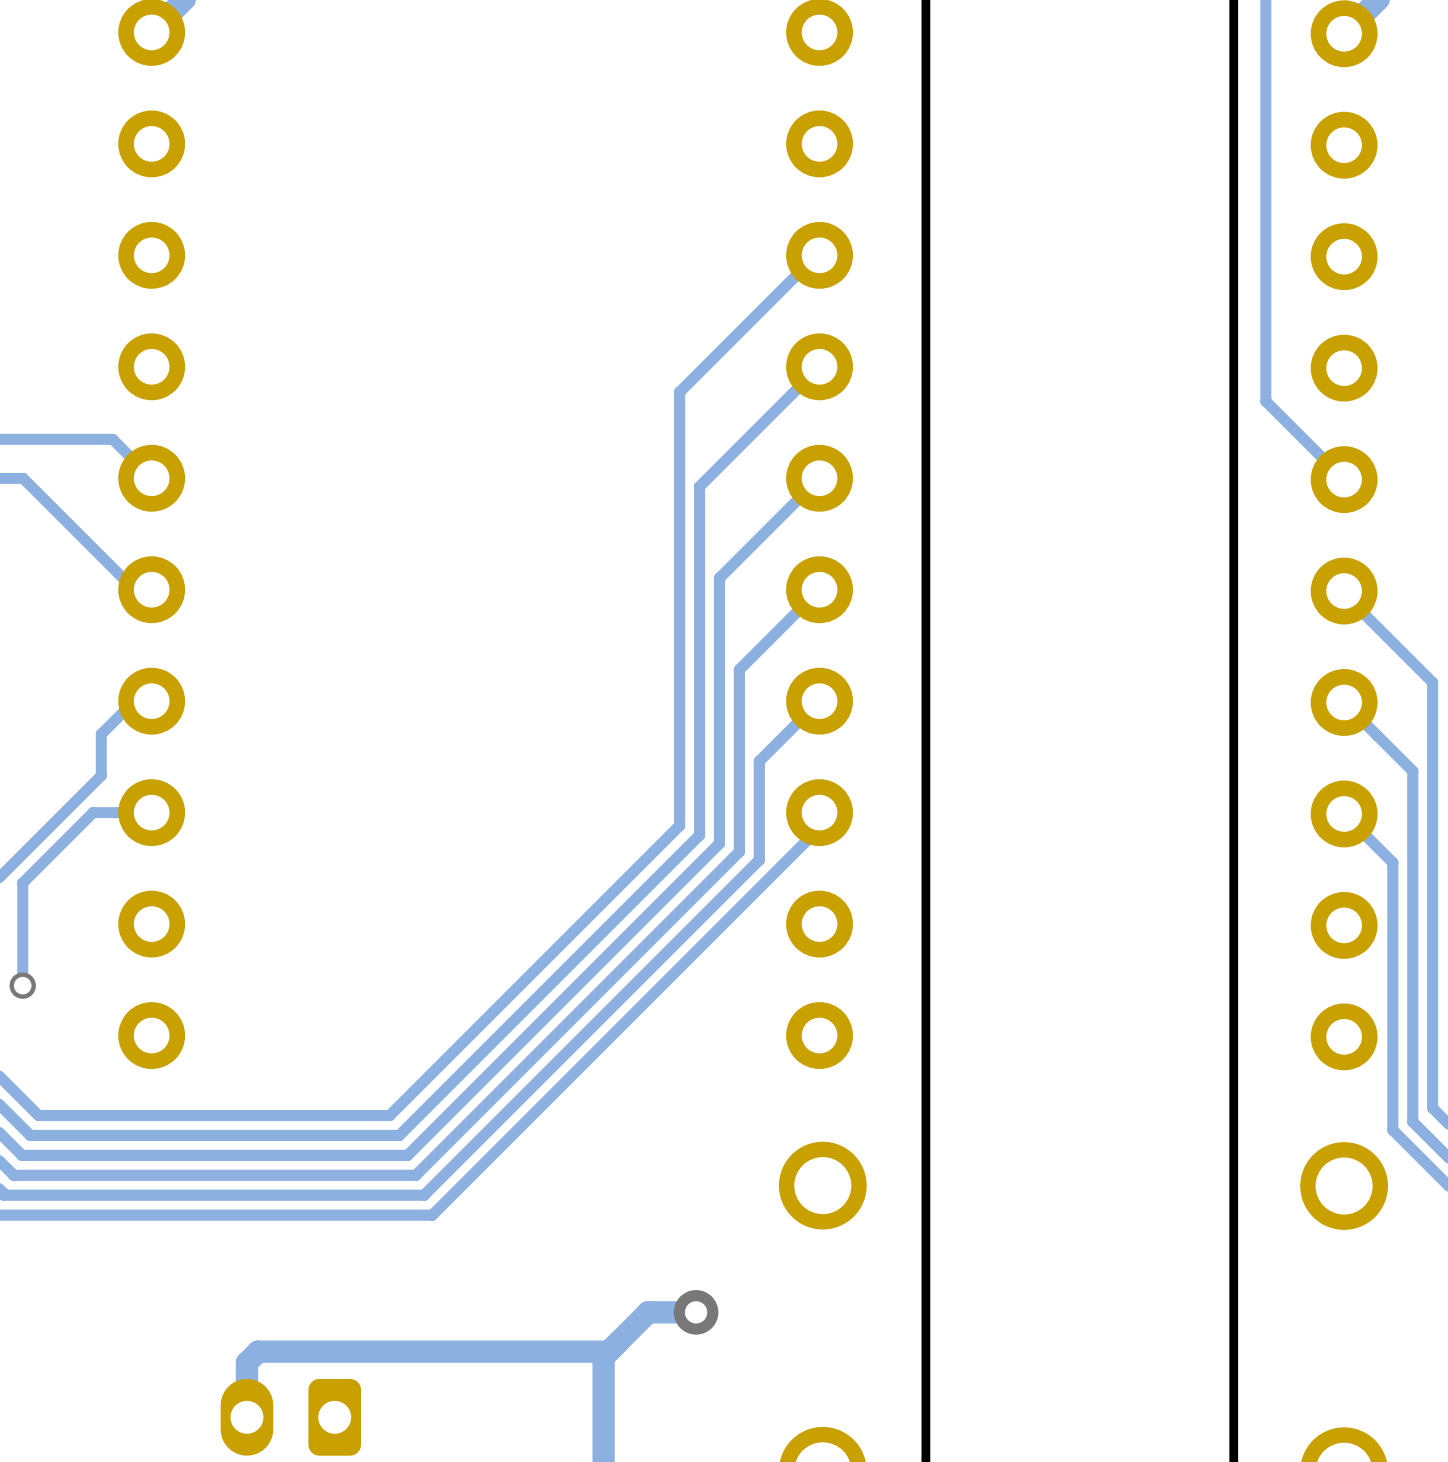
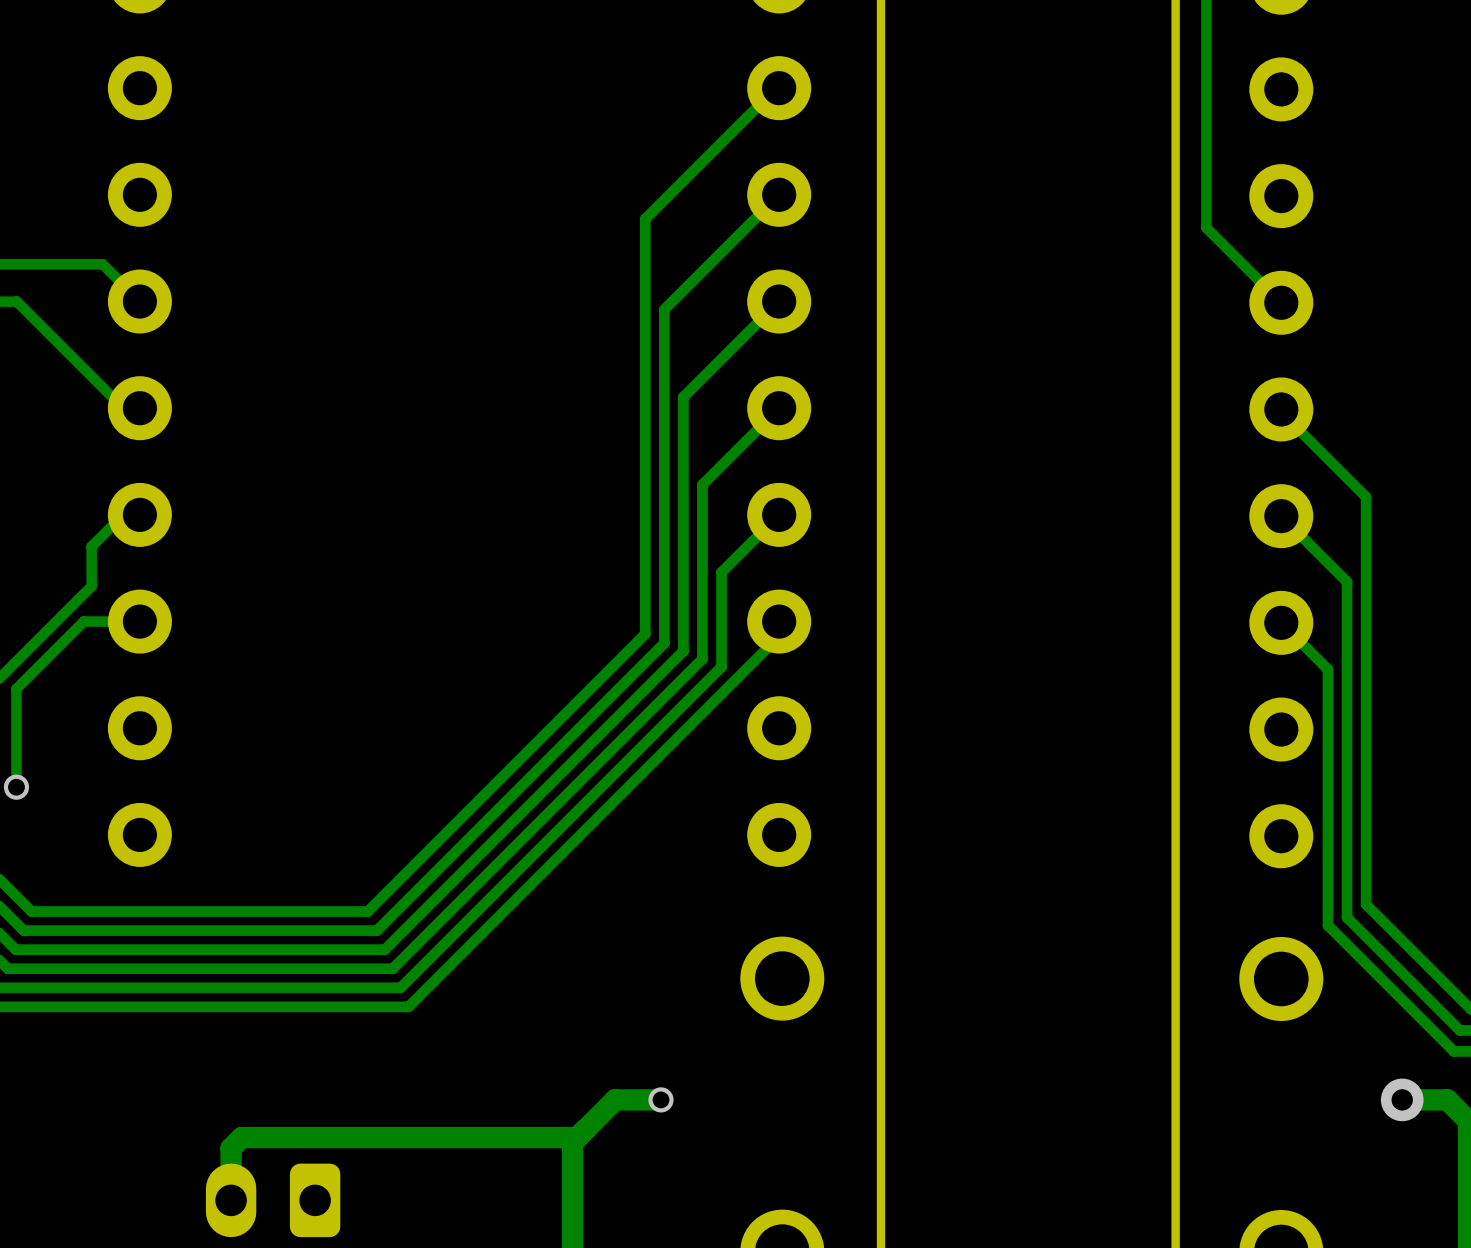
via size: [673, 1290, 719, 1335] -> [648, 1087, 674, 1113]

